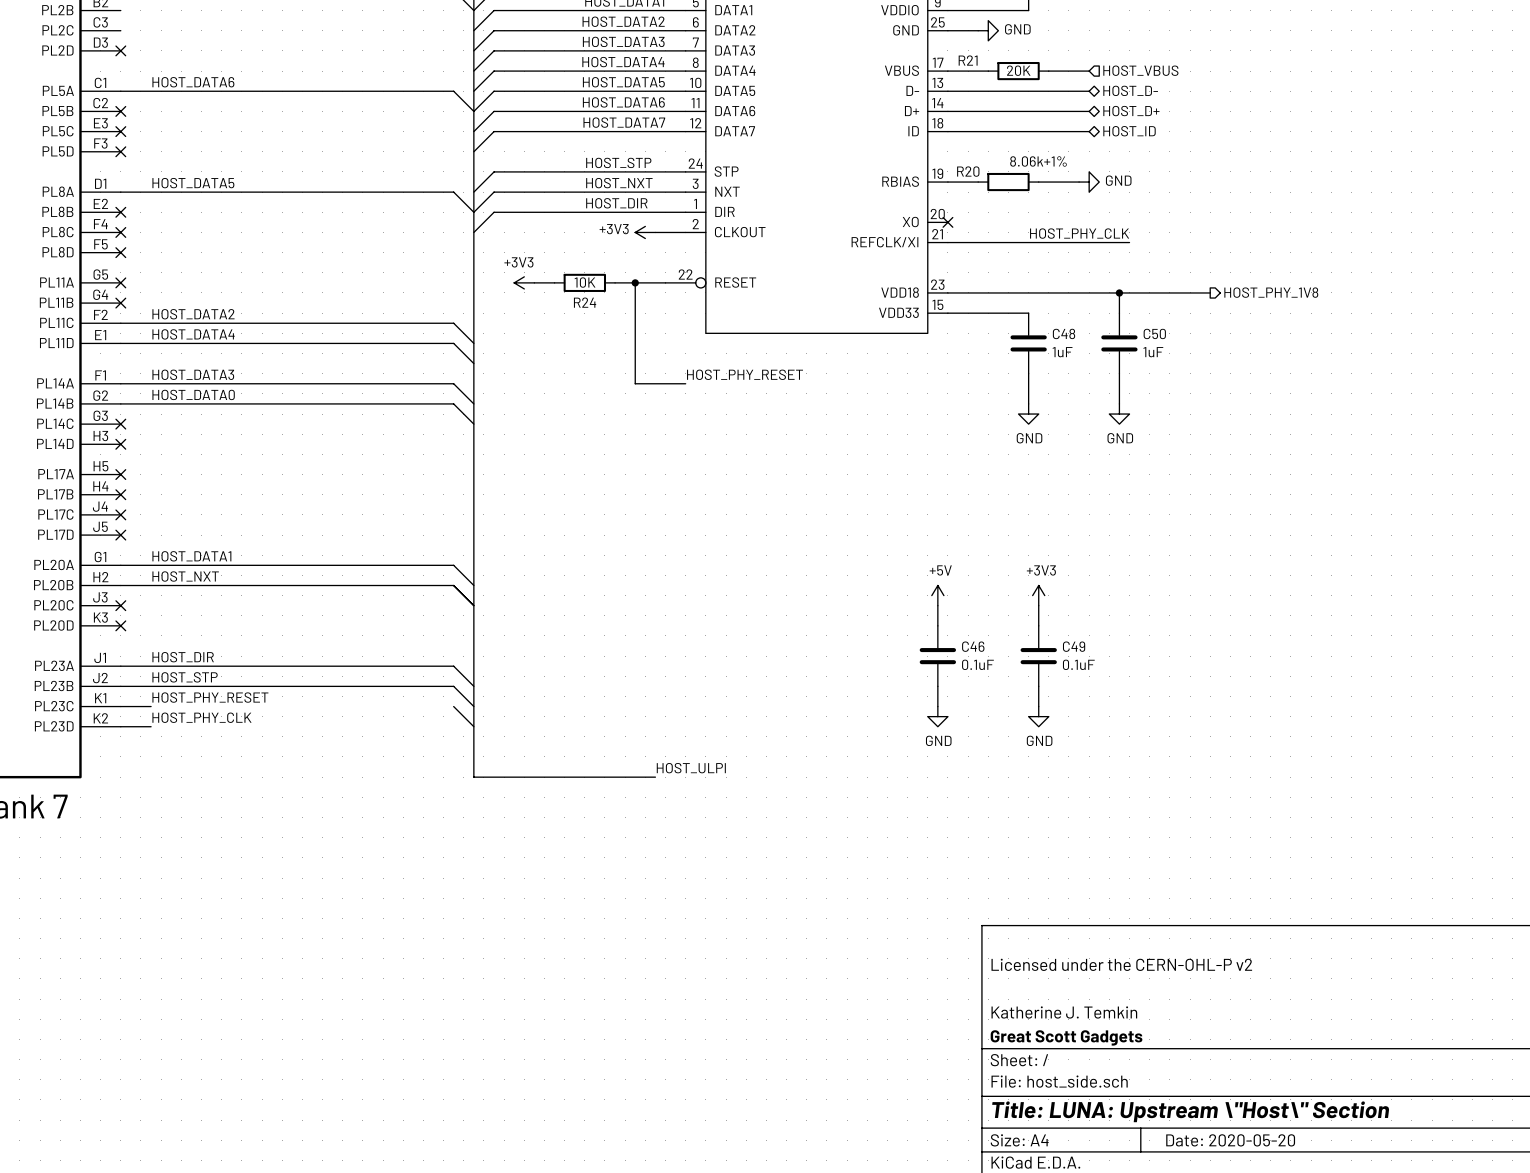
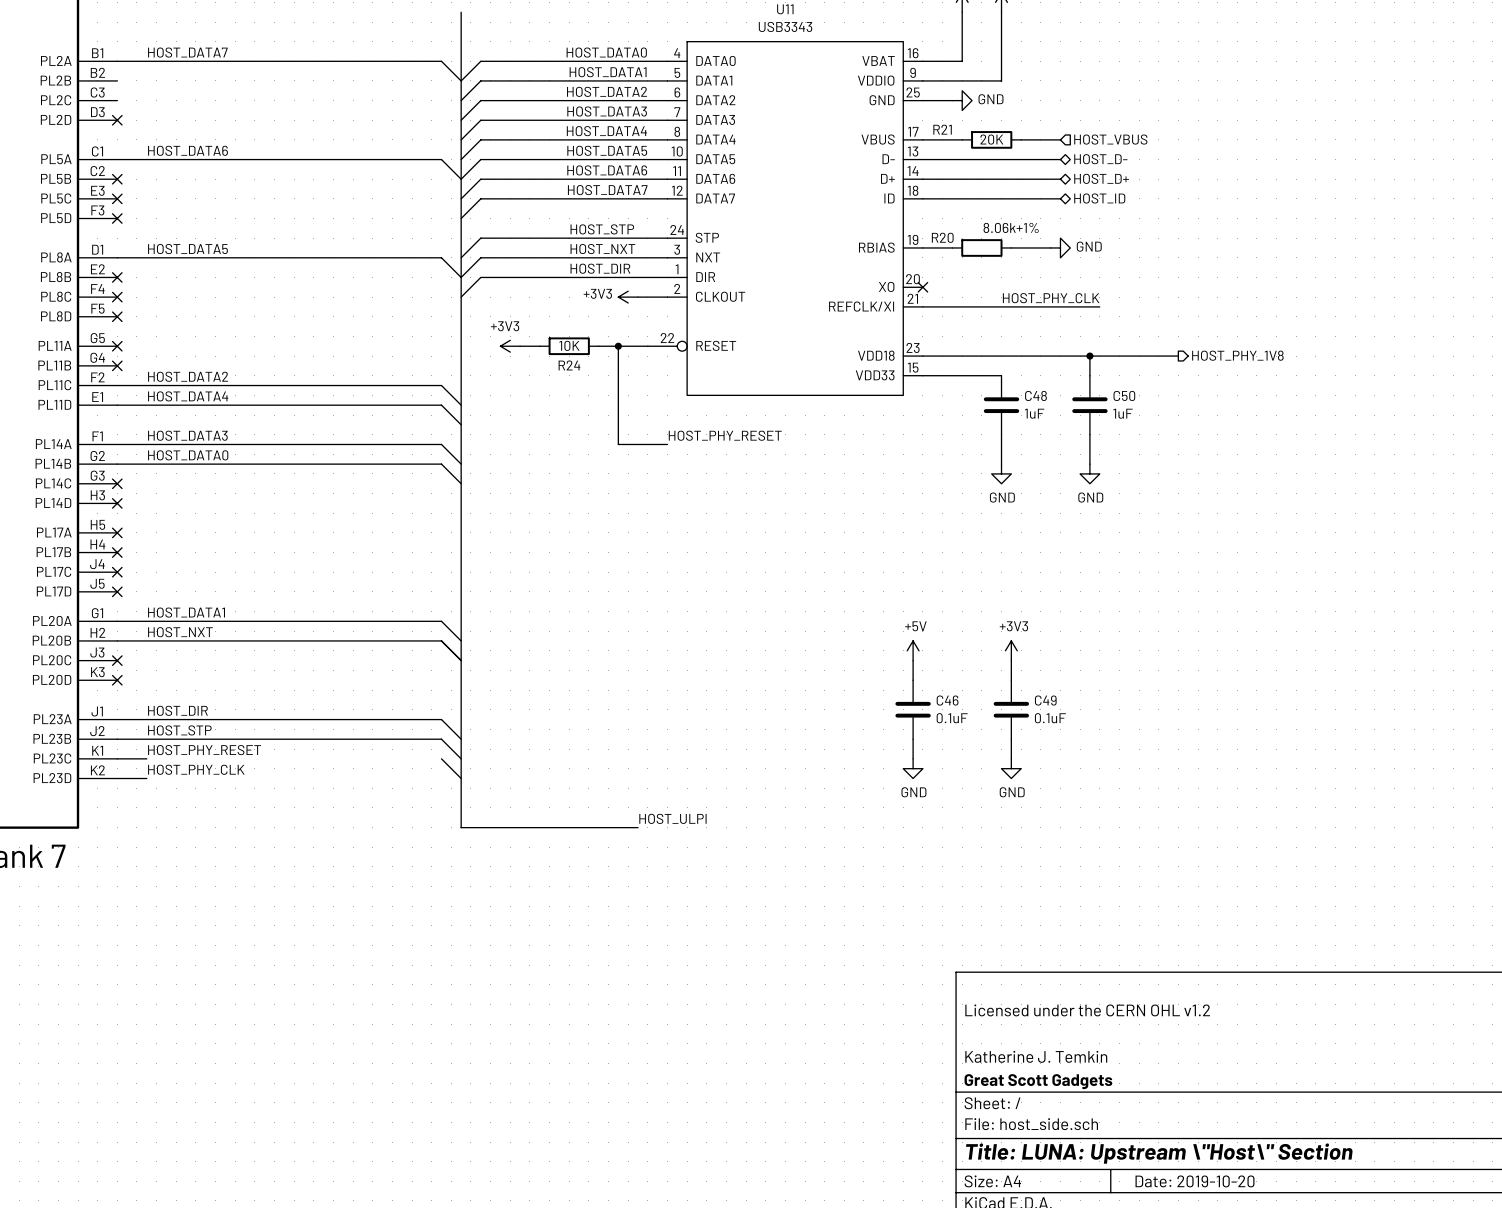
title block: Licensed under the CERN-OHL-P v2 (1121, 964) -> Licensed under the CERN OHL v1.2 (1087, 1010)
title block: Date: 2020-05-20 (1230, 1140) -> Date: 2019-10-20 (1195, 1181)

